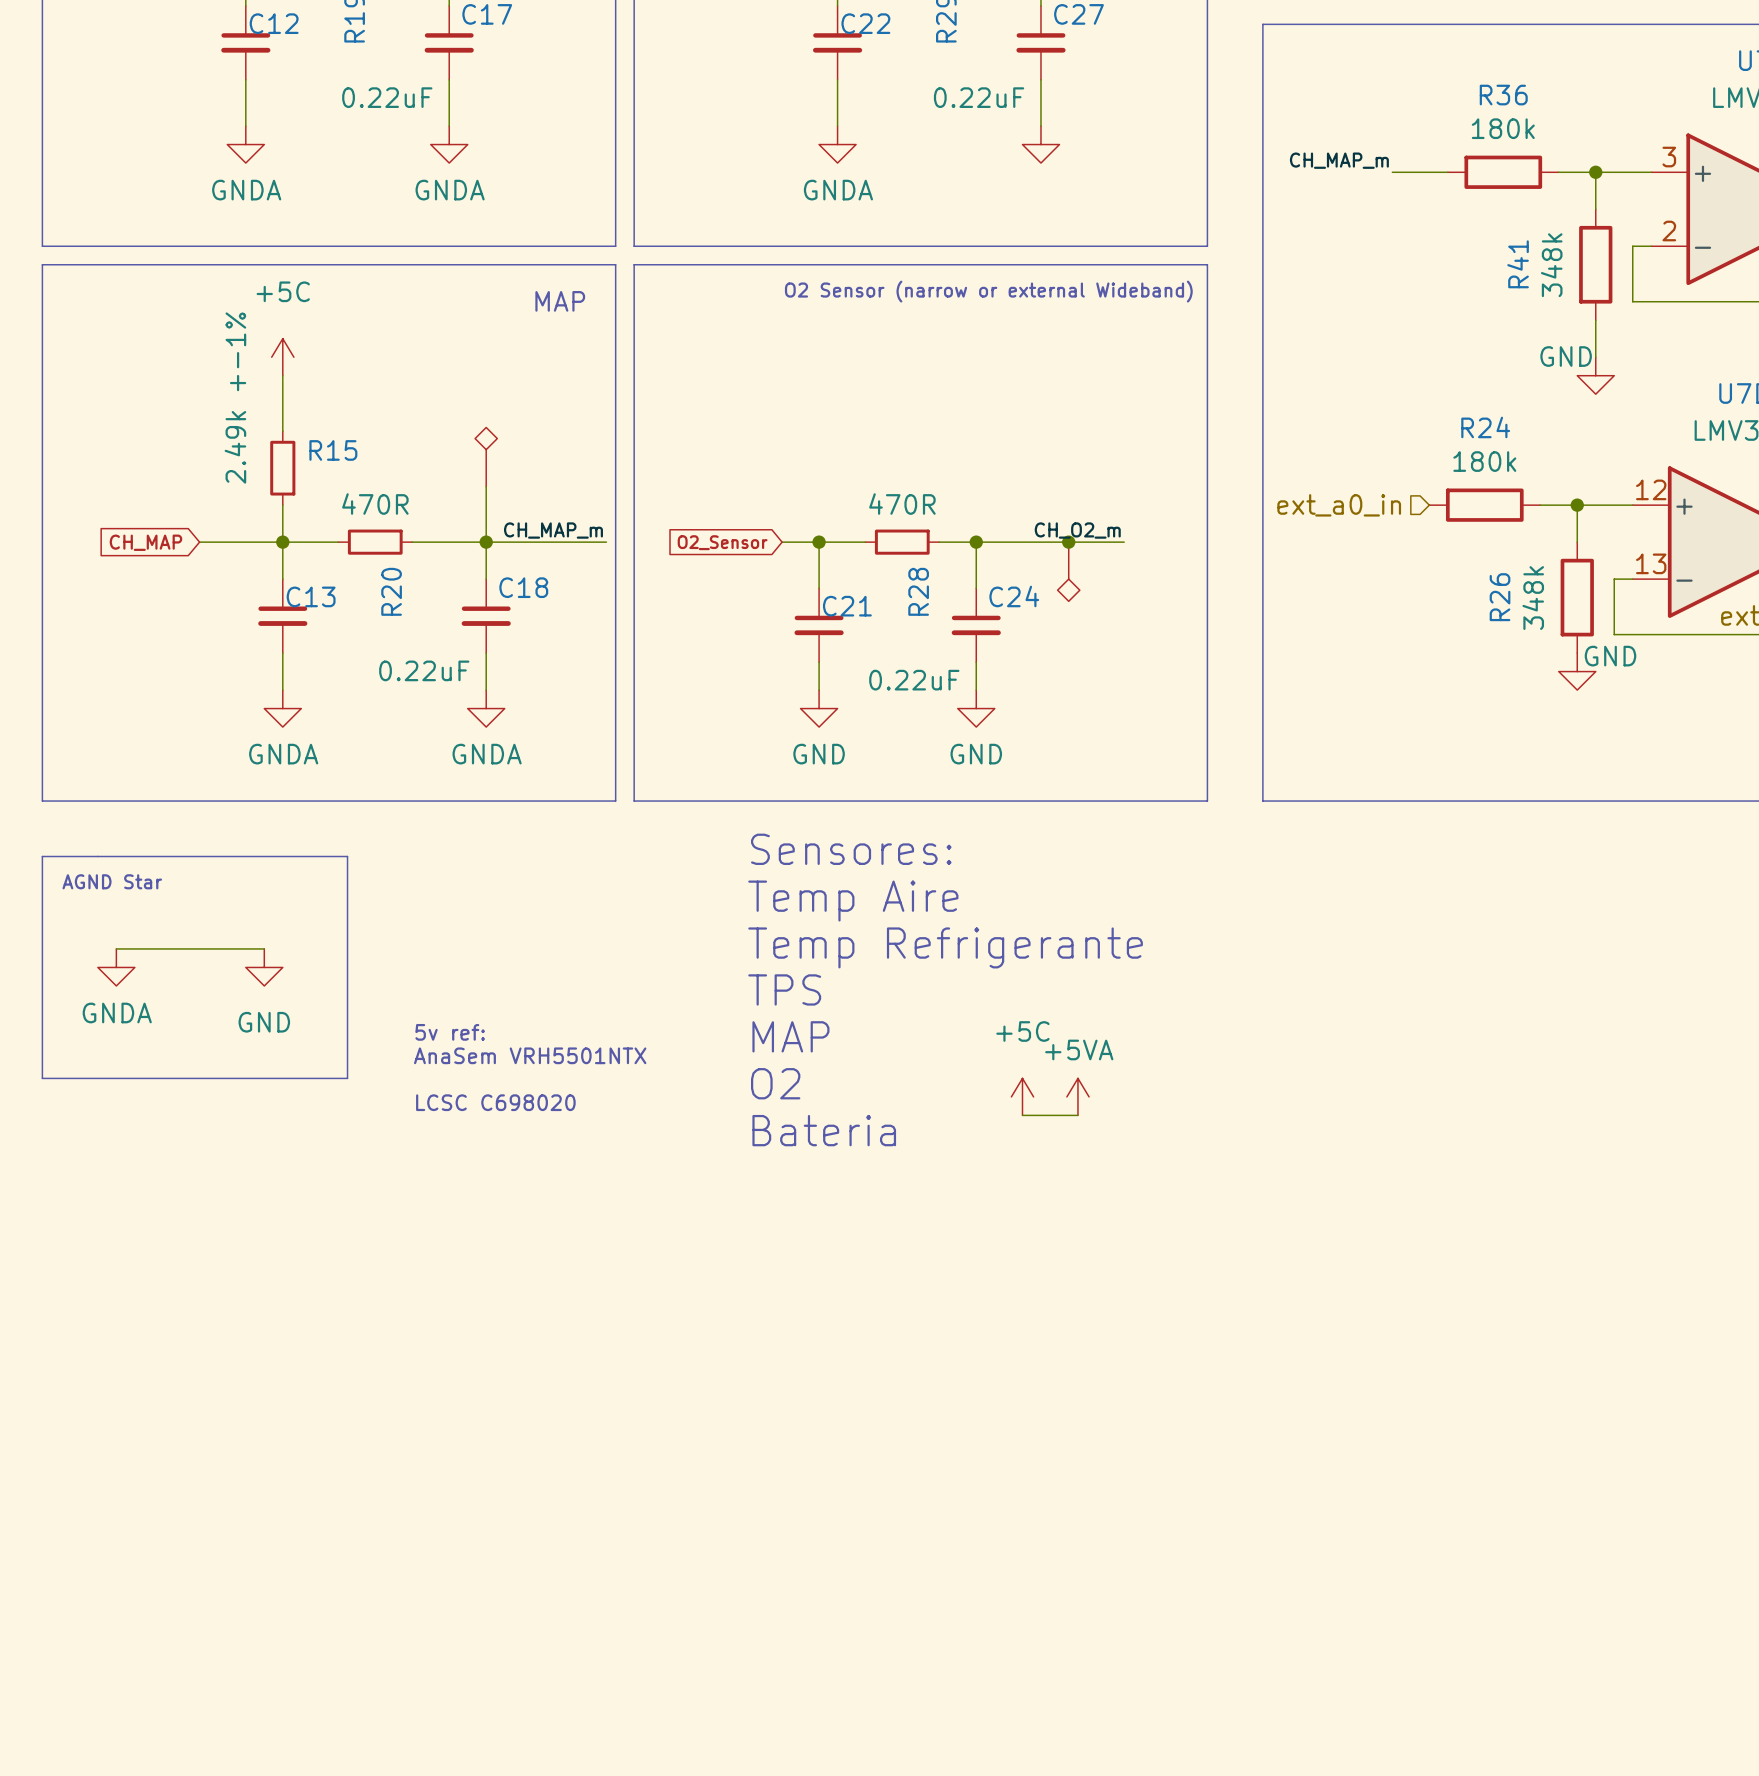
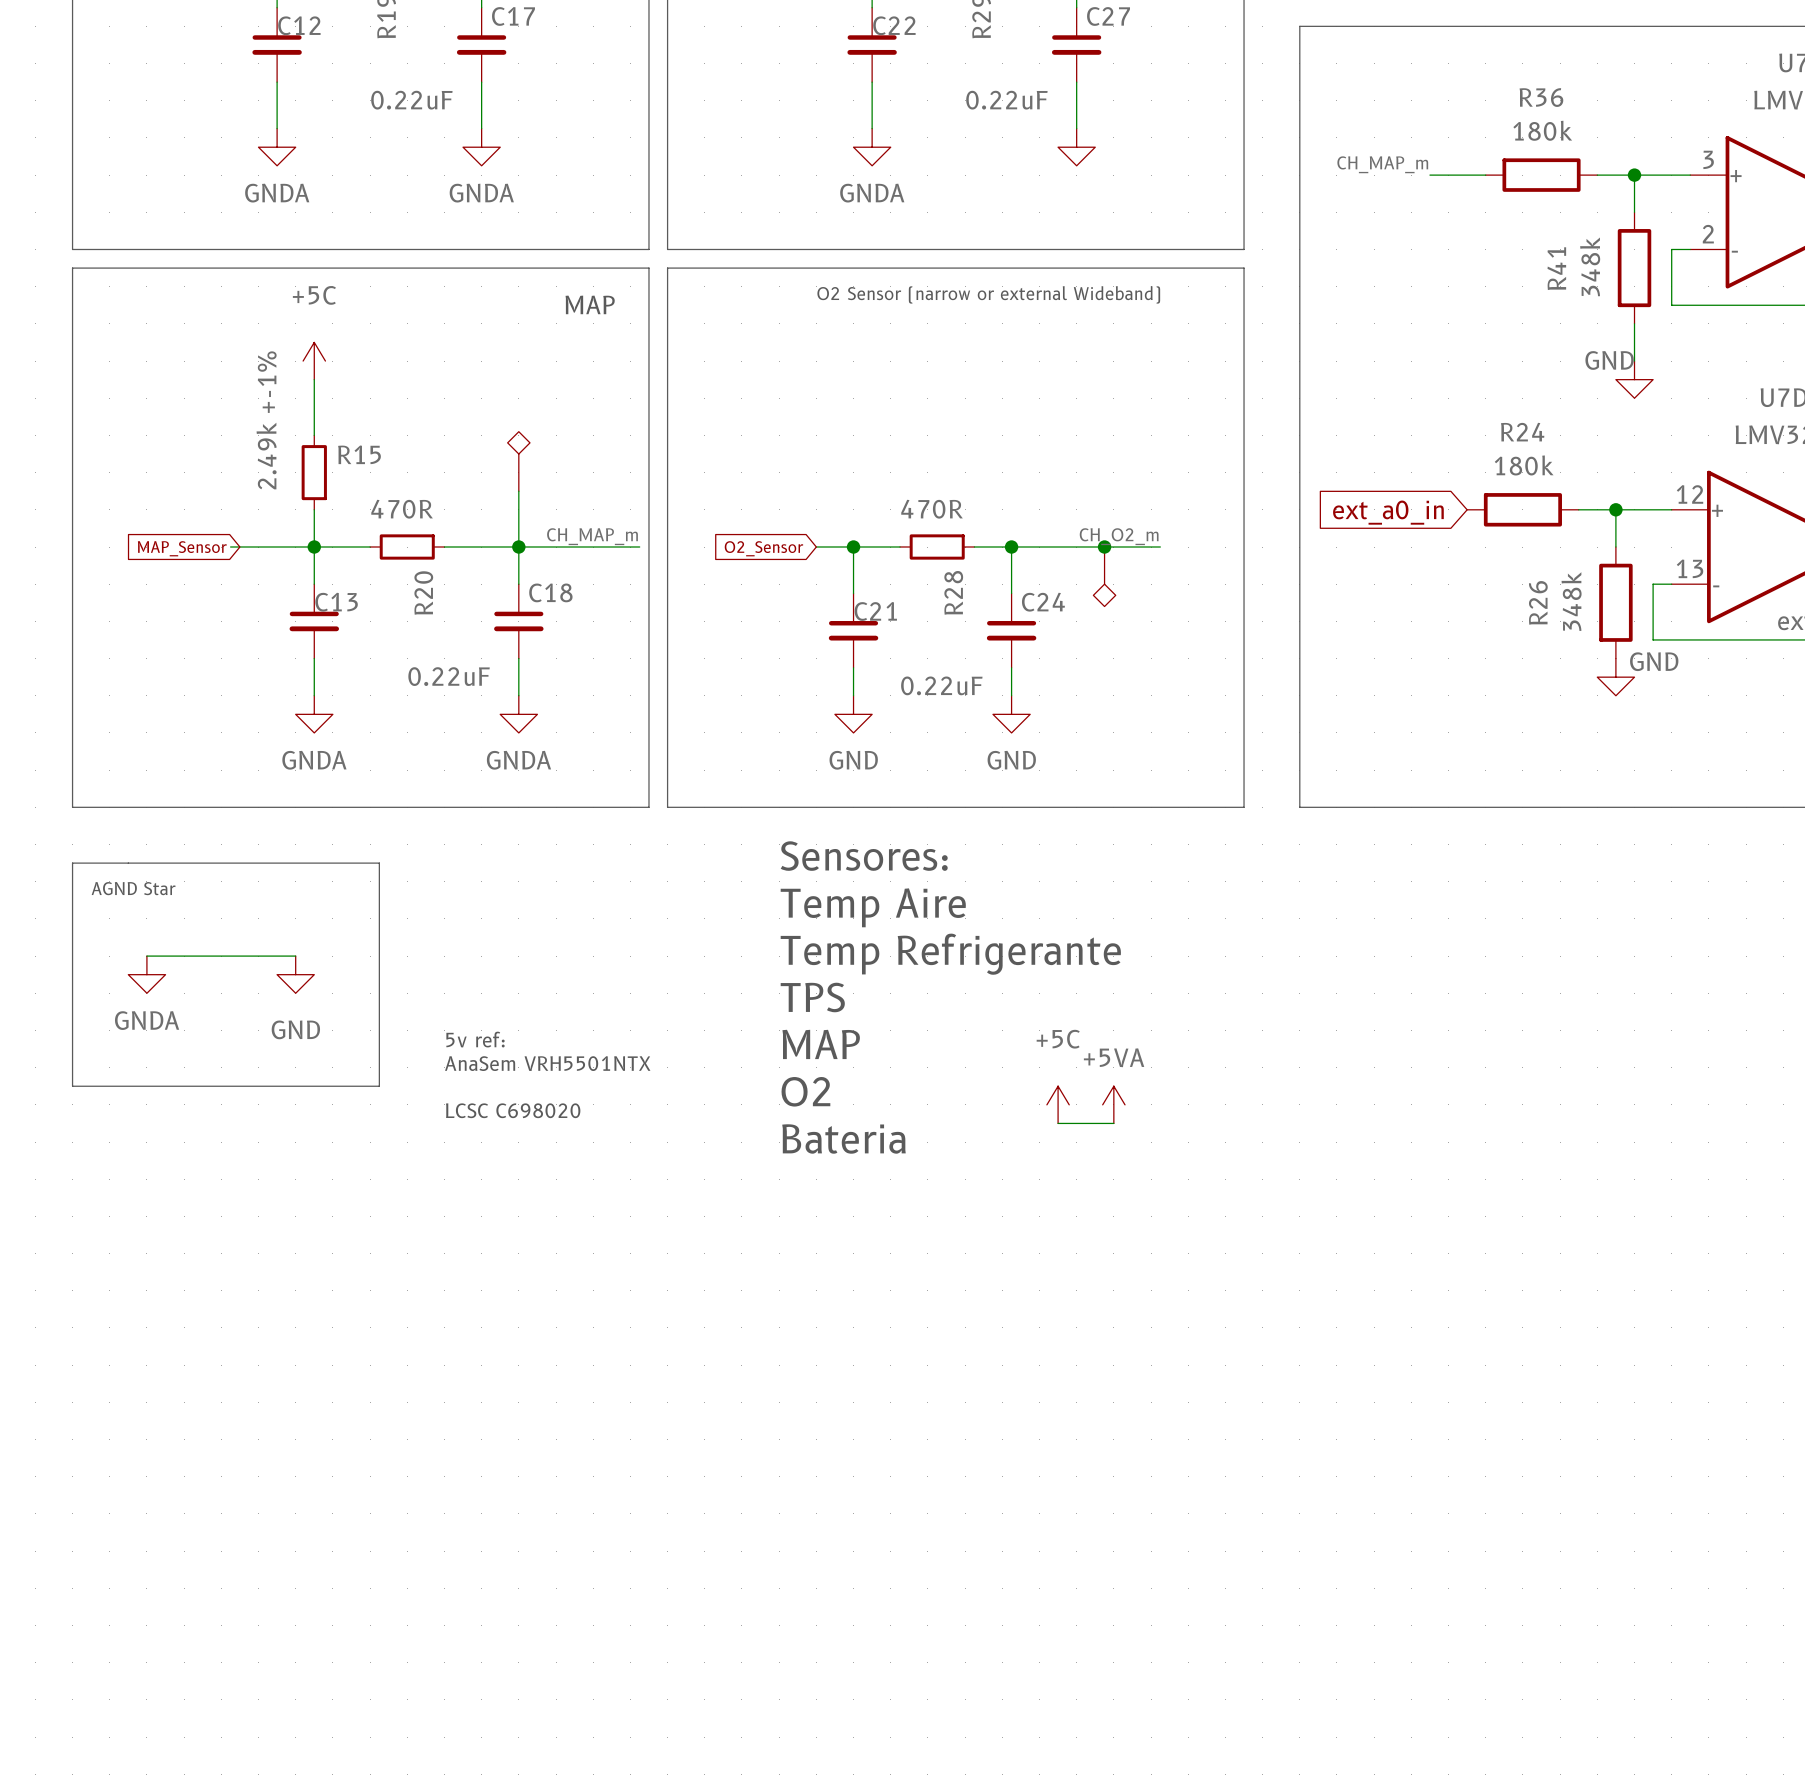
hierarchical label: ext_a0_in (1339, 505) -> none
global label: none -> ext_a0_in (1388, 512)
global label: CH_MAP (145, 542) -> MAP_Sensor (182, 548)

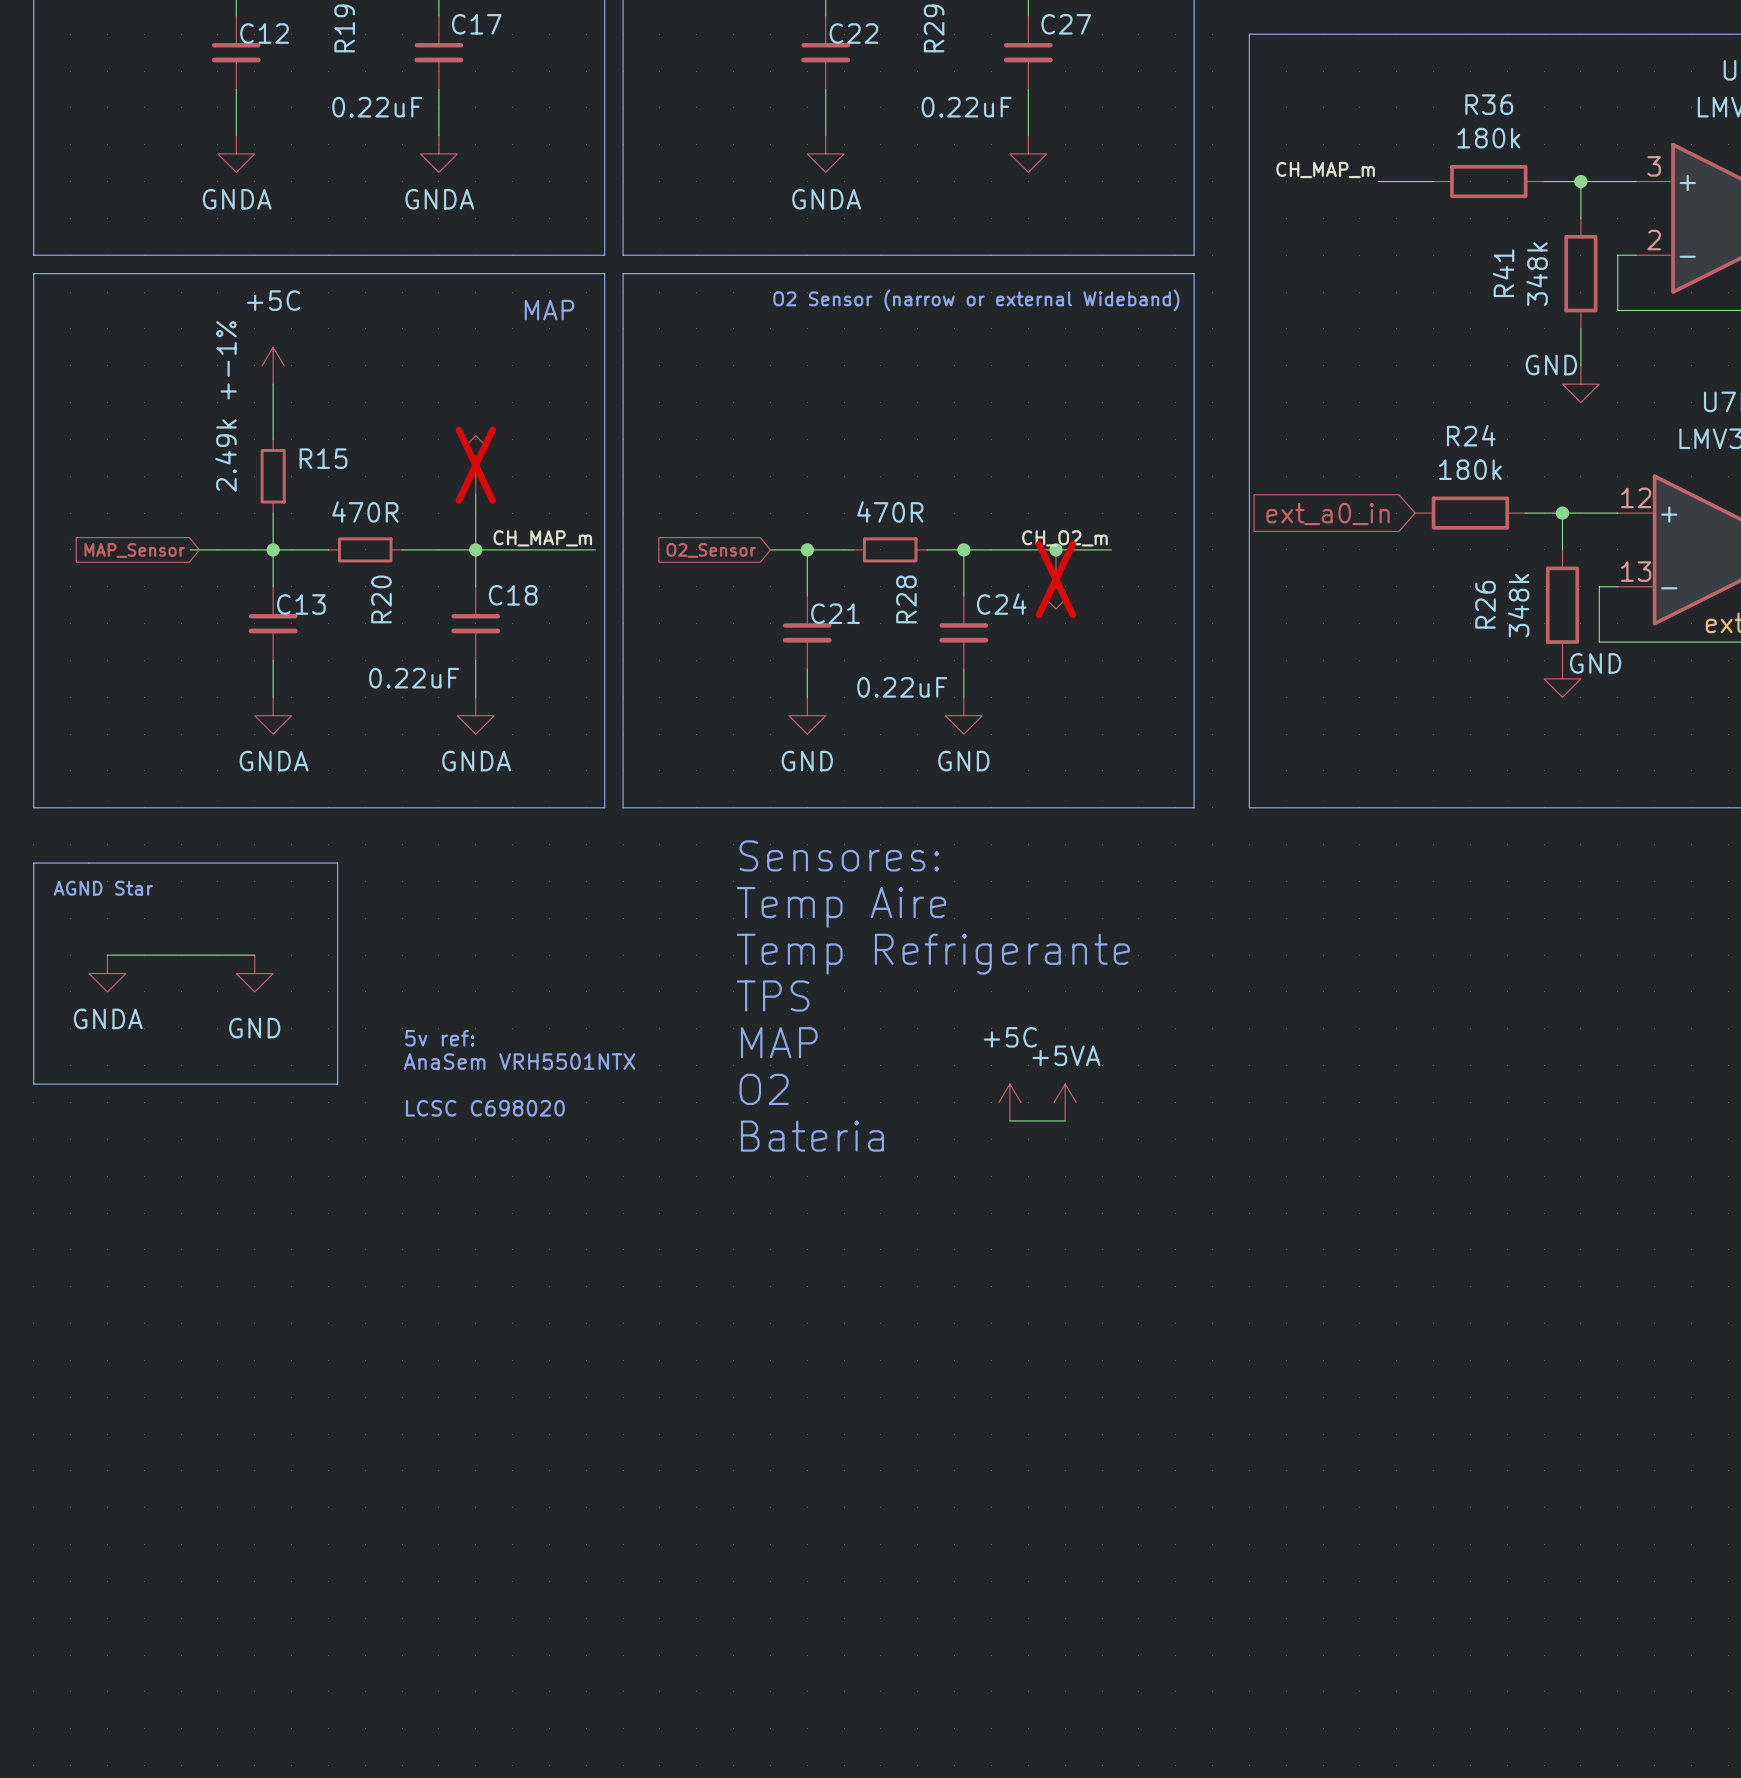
part do-not-place cross: none -> (475, 465)
part do-not-place cross: none -> (1055, 579)

